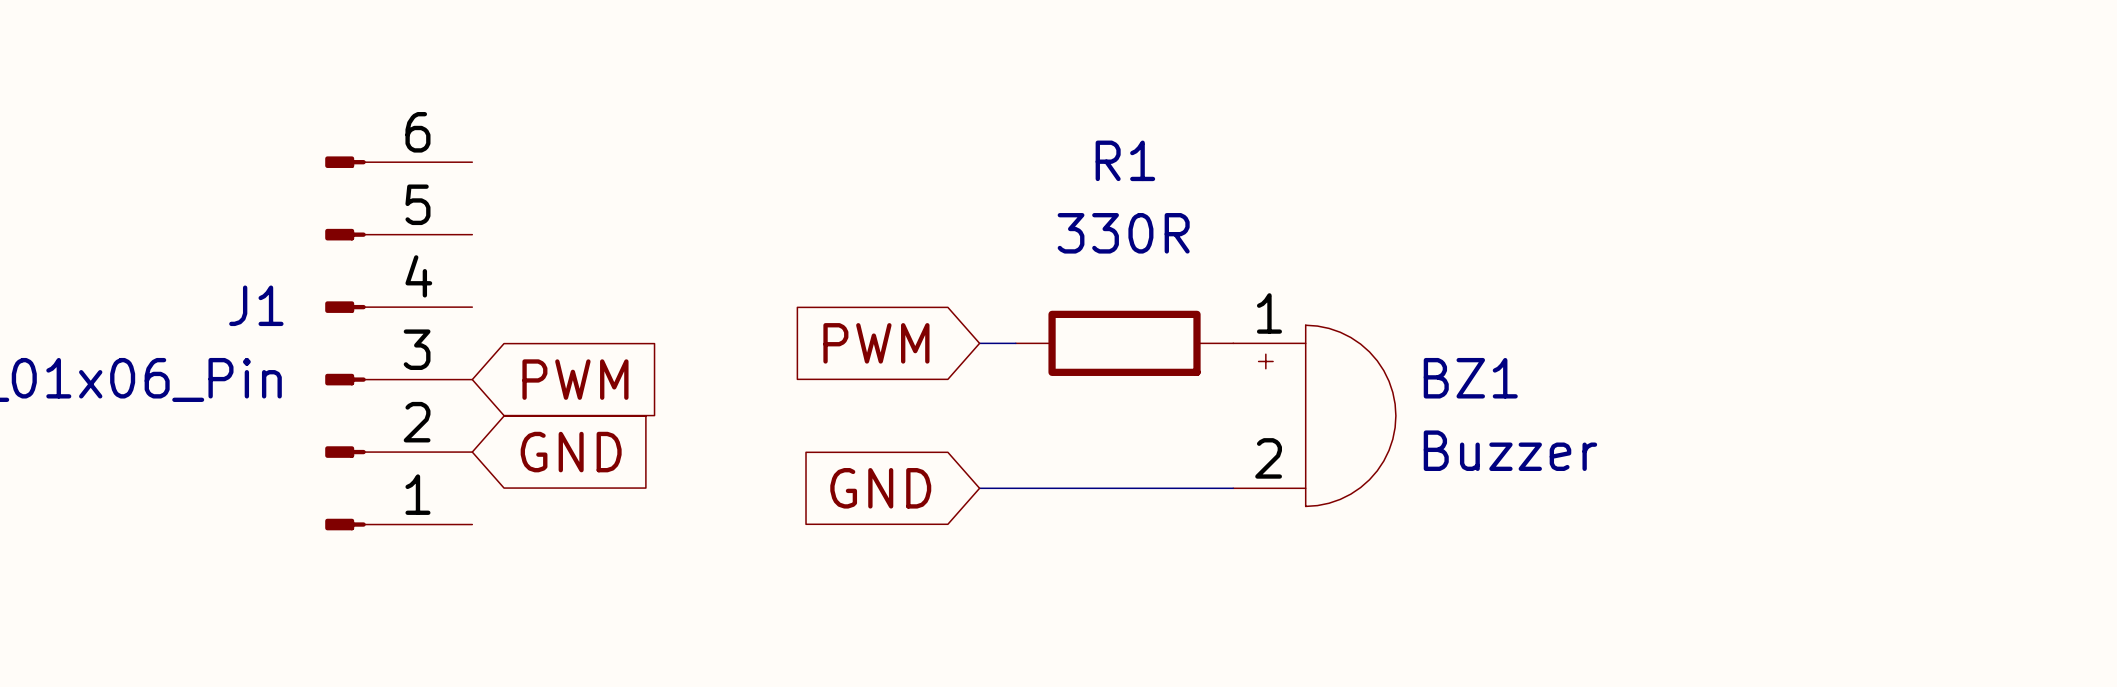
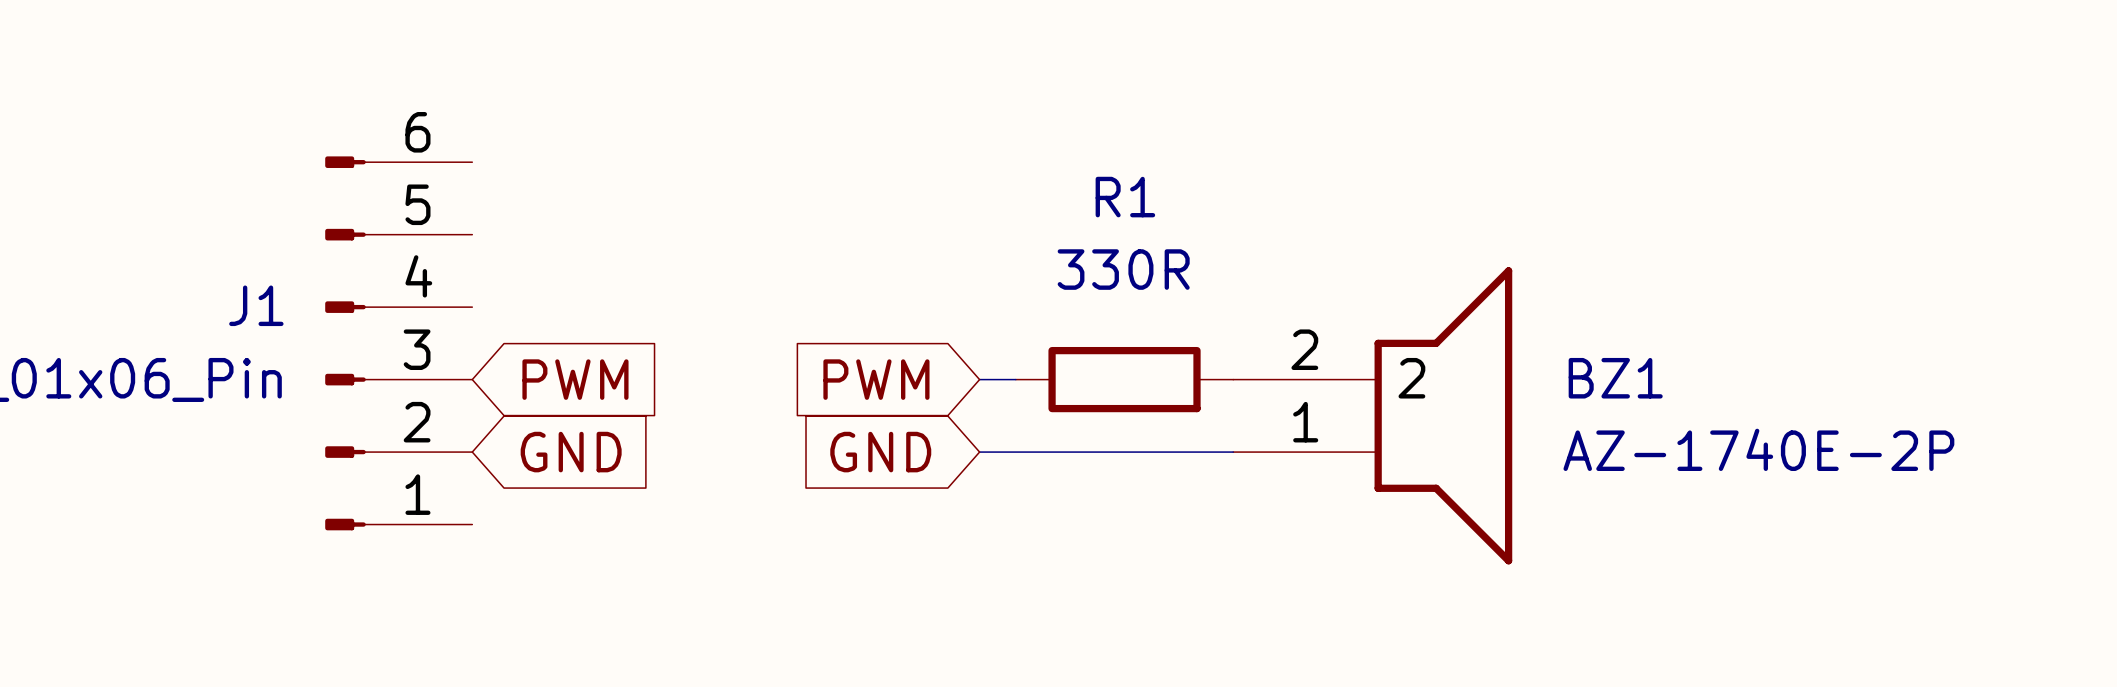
BZ1 symbol: [1233, 325, 1396, 507] -> [1233, 267, 1513, 565]
global label position: PWM (876, 343) -> PWM (876, 379)
wire: (979, 343) (1015, 343) -> (979, 379) (1015, 379)
R1 position: (1124, 343) -> (1124, 379)
BZ1 name position: BZ1 (1470, 378) -> BZ1 (1615, 378)
BZ1 value: Buzzer (1510, 450) -> AZ-1740E-2P (1758, 449)
global label position: GND (880, 488) -> GND (880, 452)
wire: (979, 488) (1233, 488) -> (979, 452) (1233, 452)

